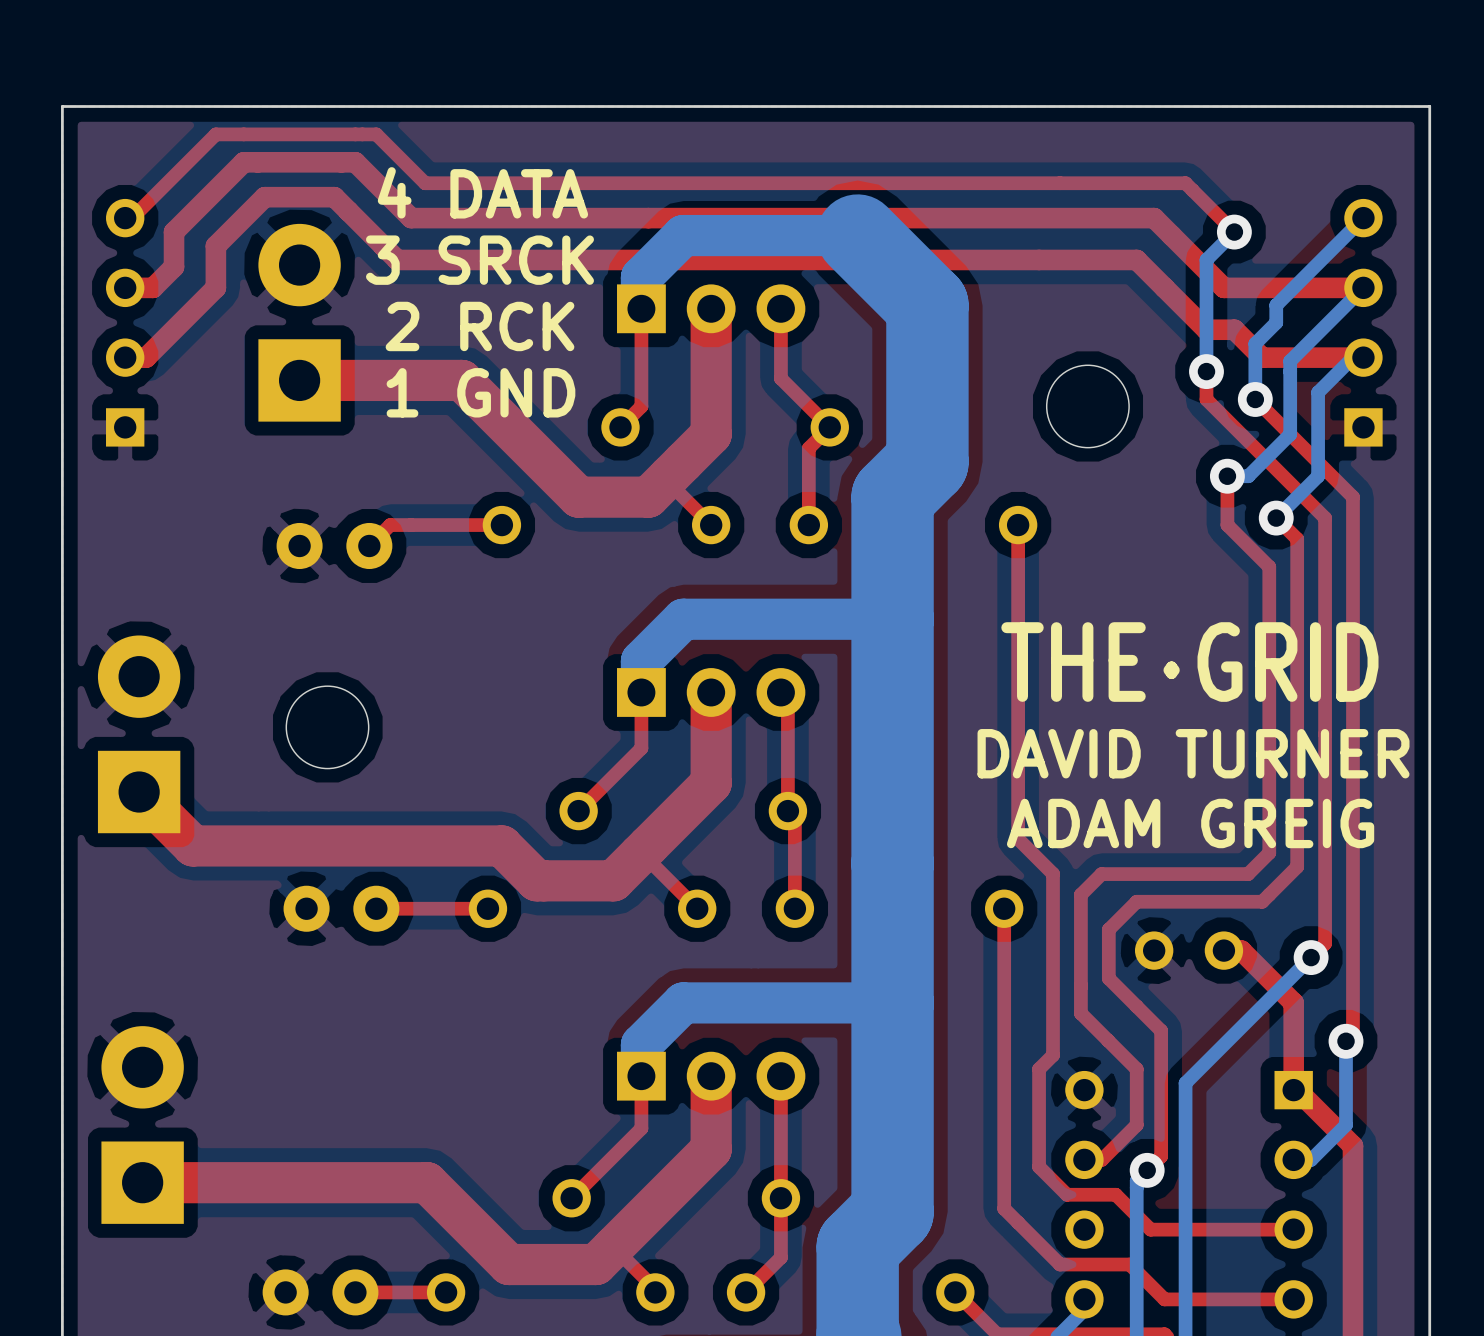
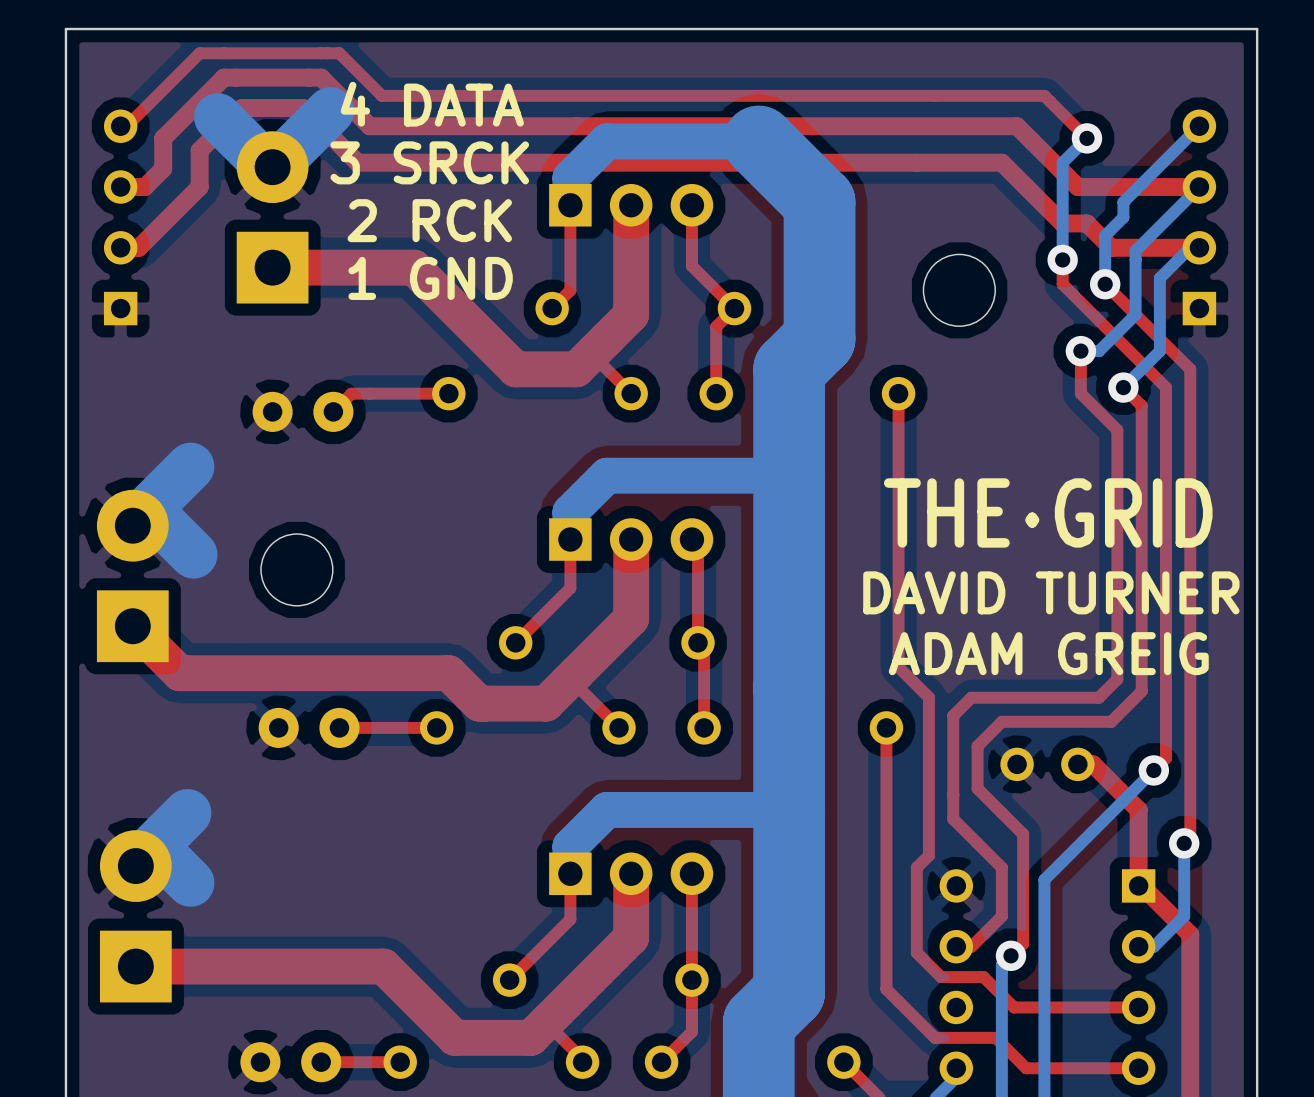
bottom track: none -> (330, 111) (274, 167) (267, 167) (217, 117)
bottom track: none -> (190, 466) (132, 525) (164, 525) (193, 554)
bottom track: none -> (187, 813) (135, 866) (173, 866) (190, 882)

